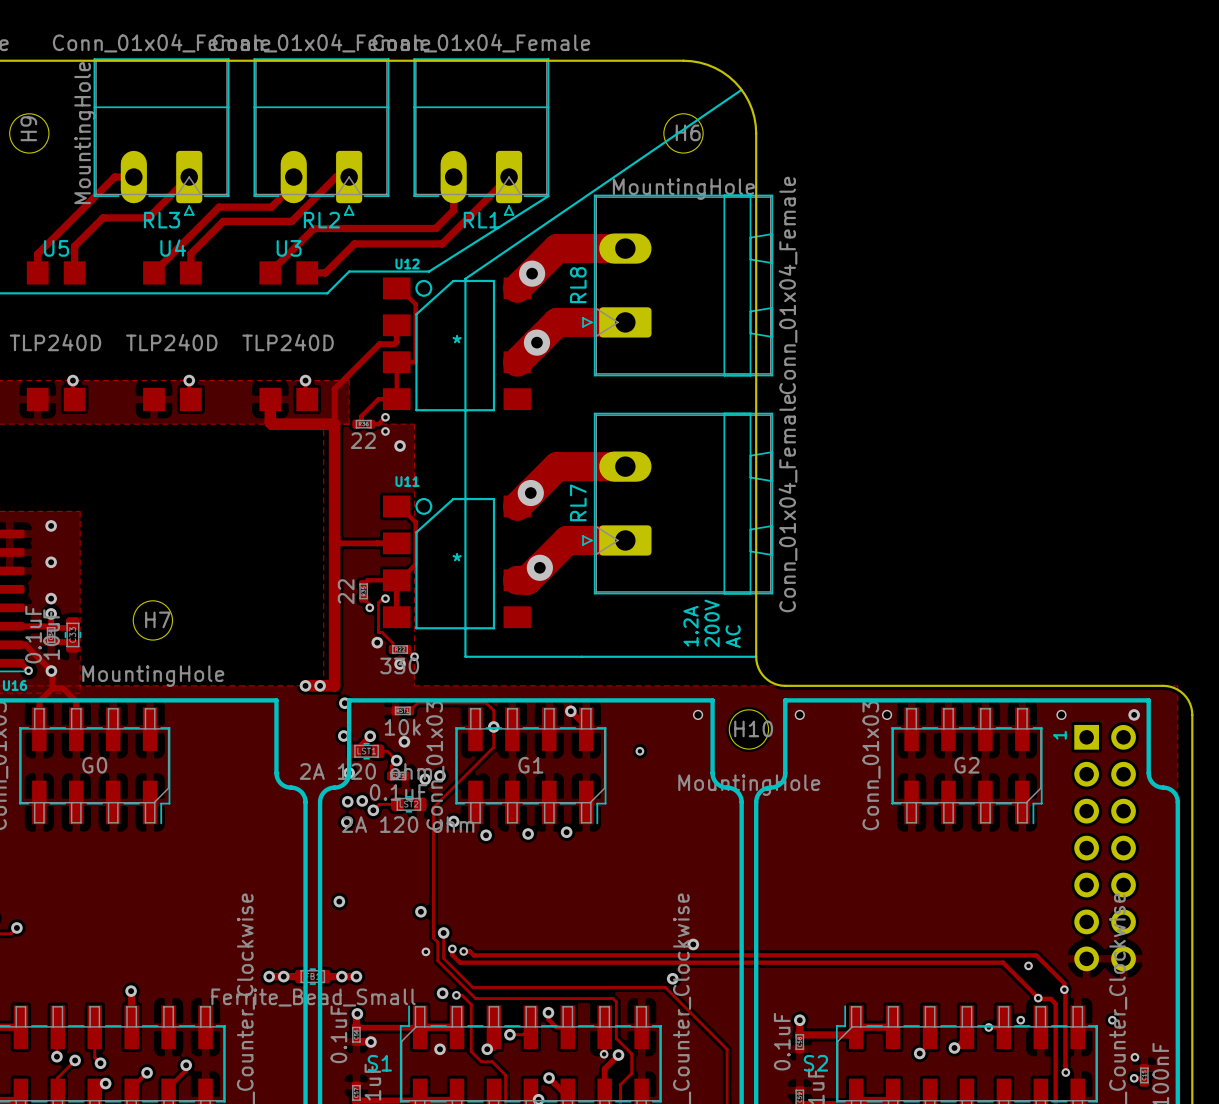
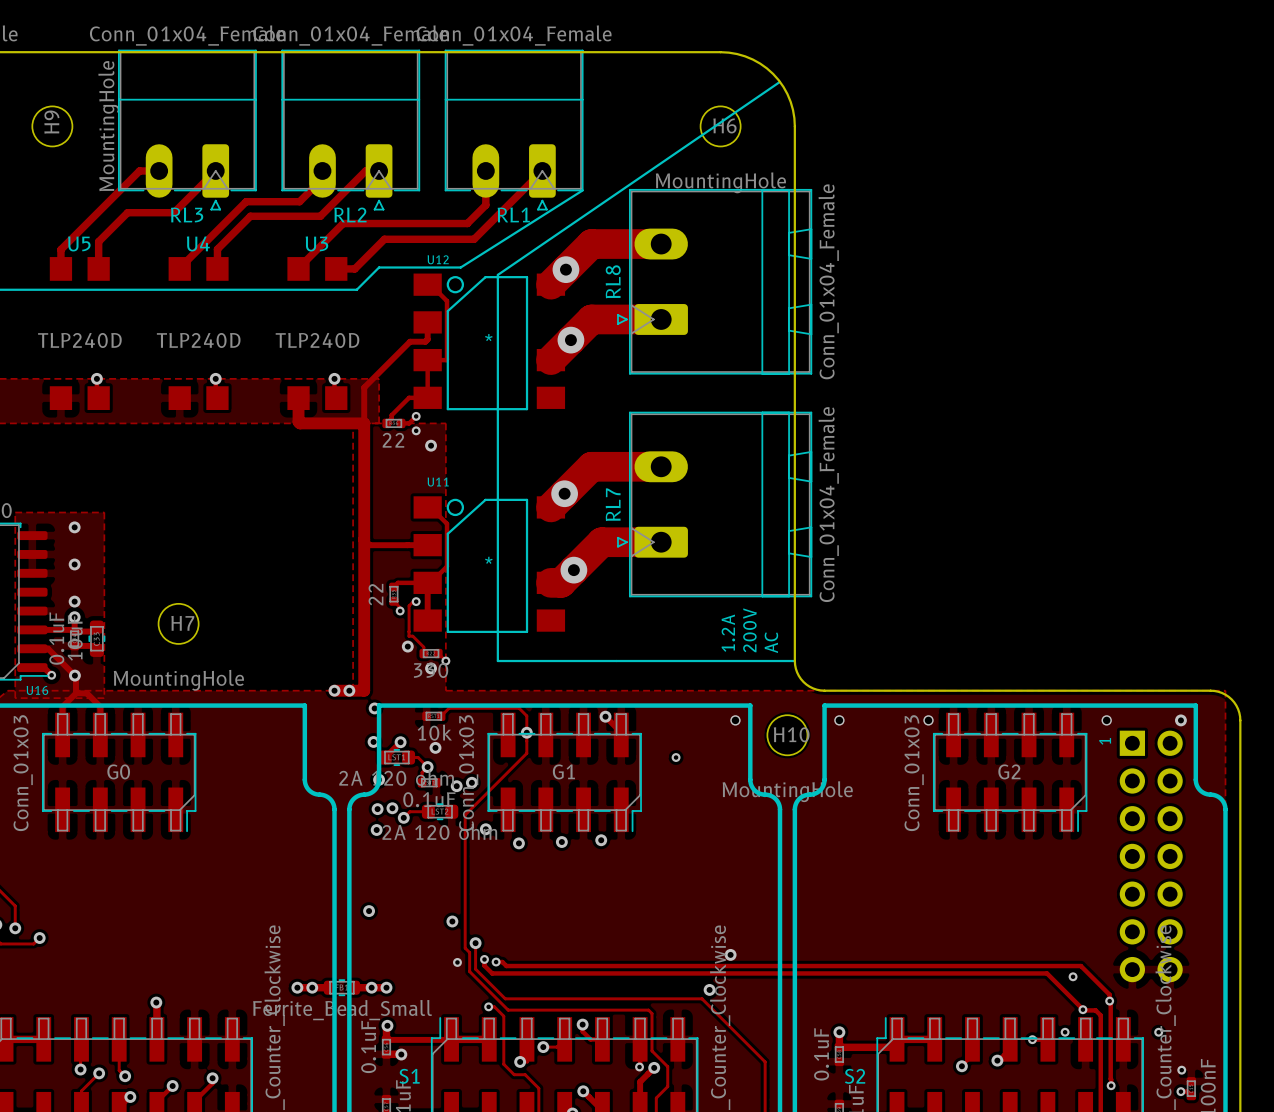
via: (442, 993) -> none
via: (440, 1049) -> none

